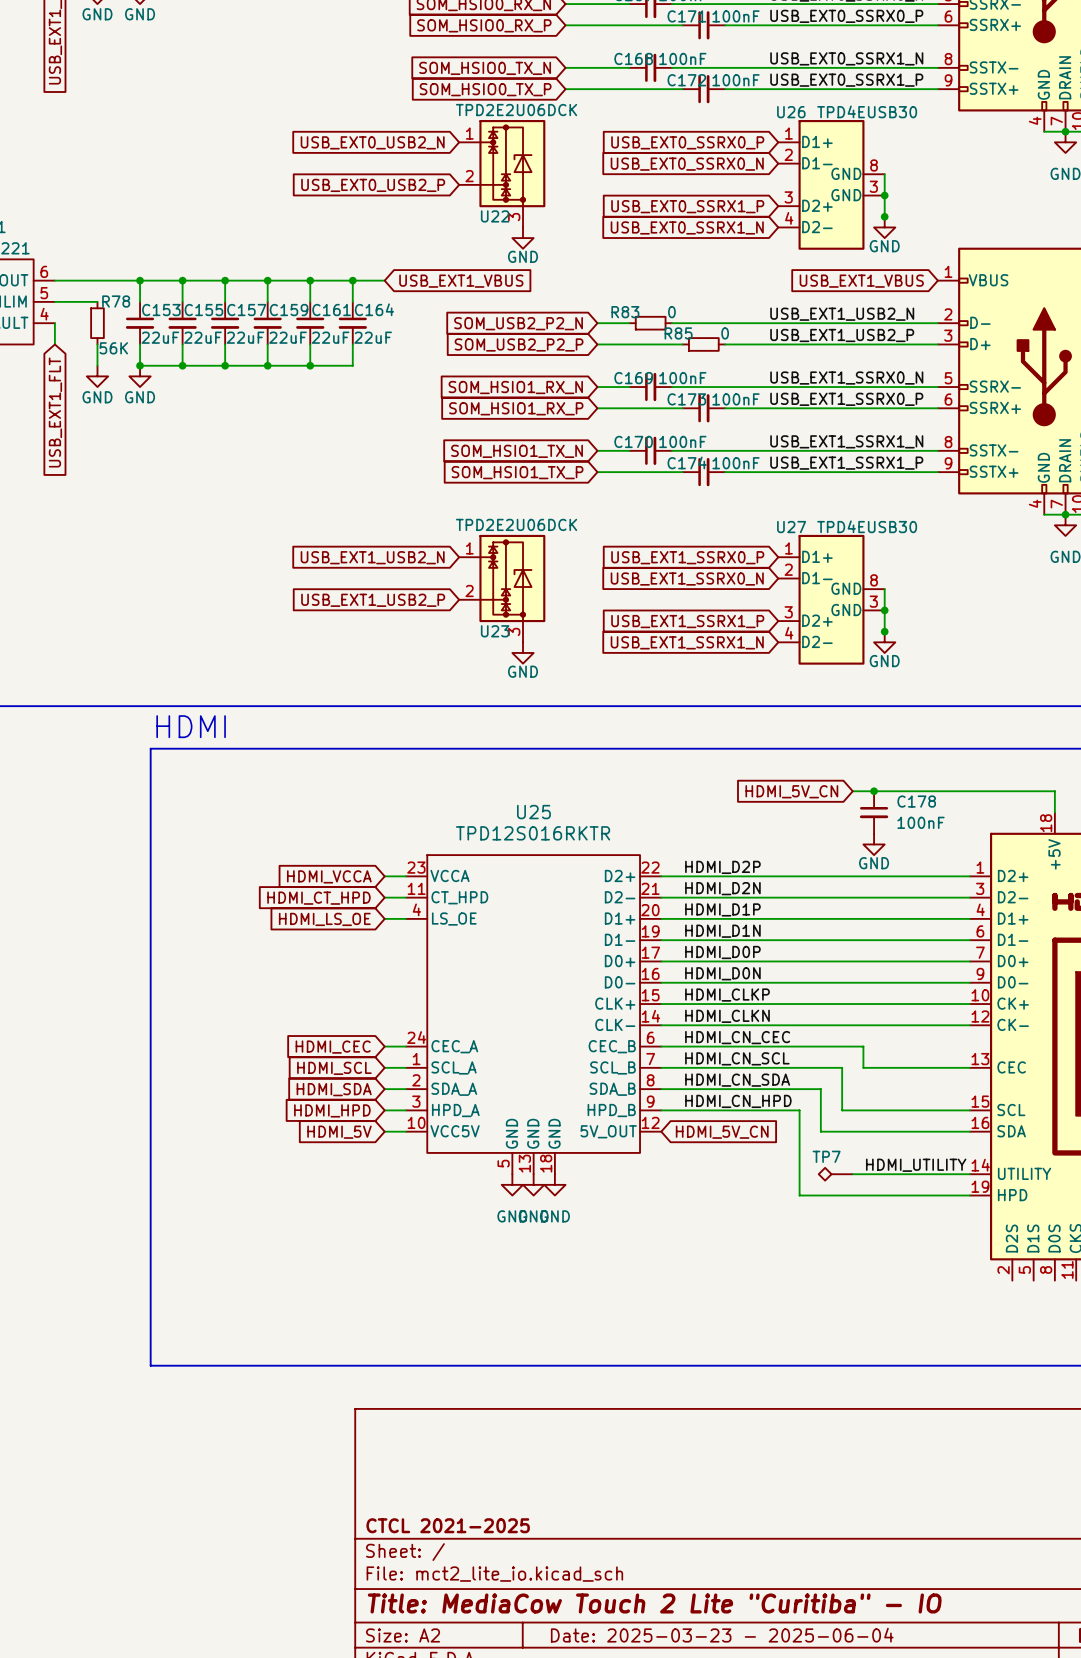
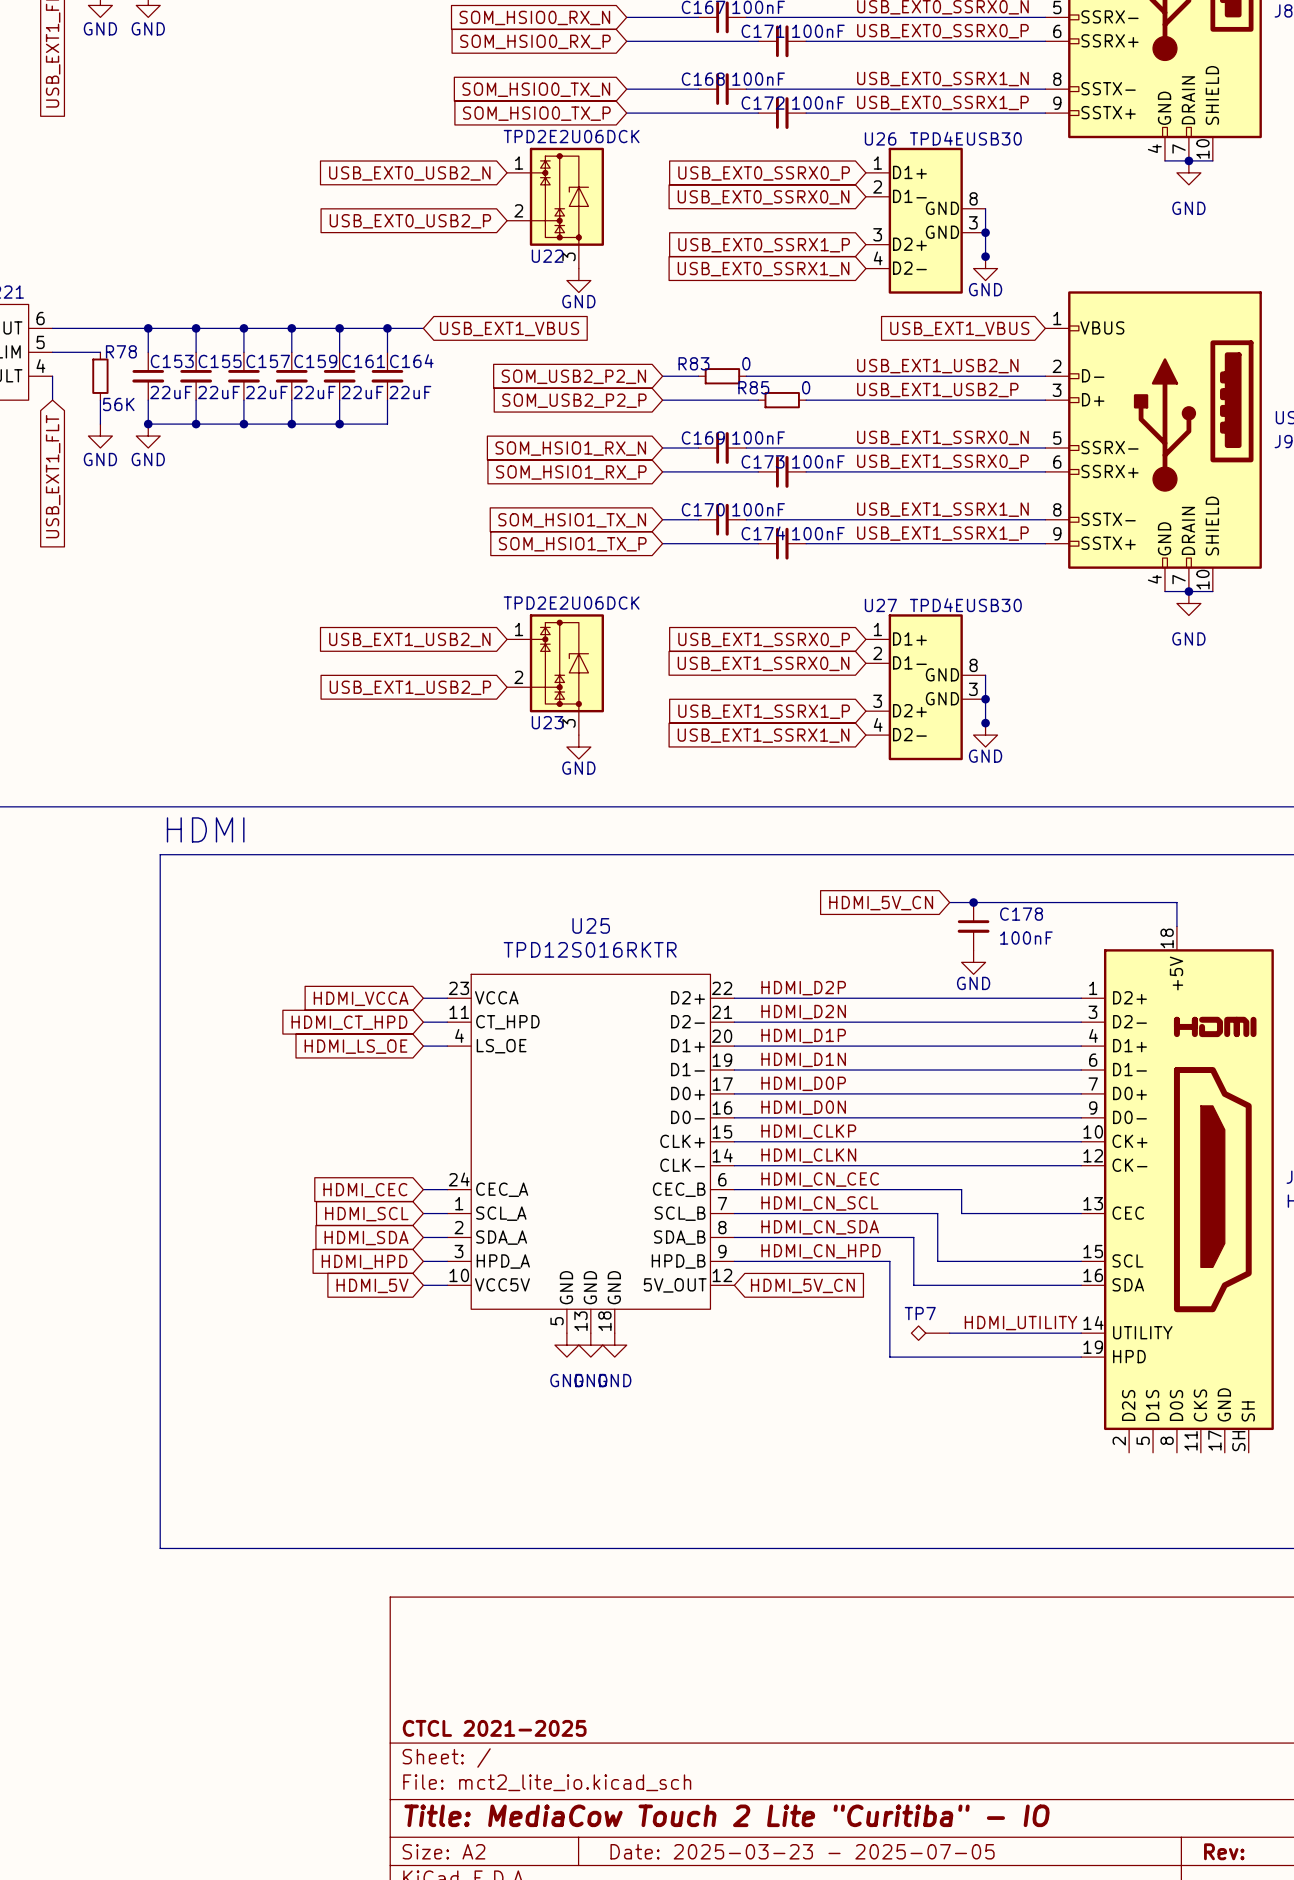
title block: Date: 2025-03-23 - 2025-06-04 (722, 1635) -> Date: 2025-03-23 - 2025-07-05 (802, 1851)

